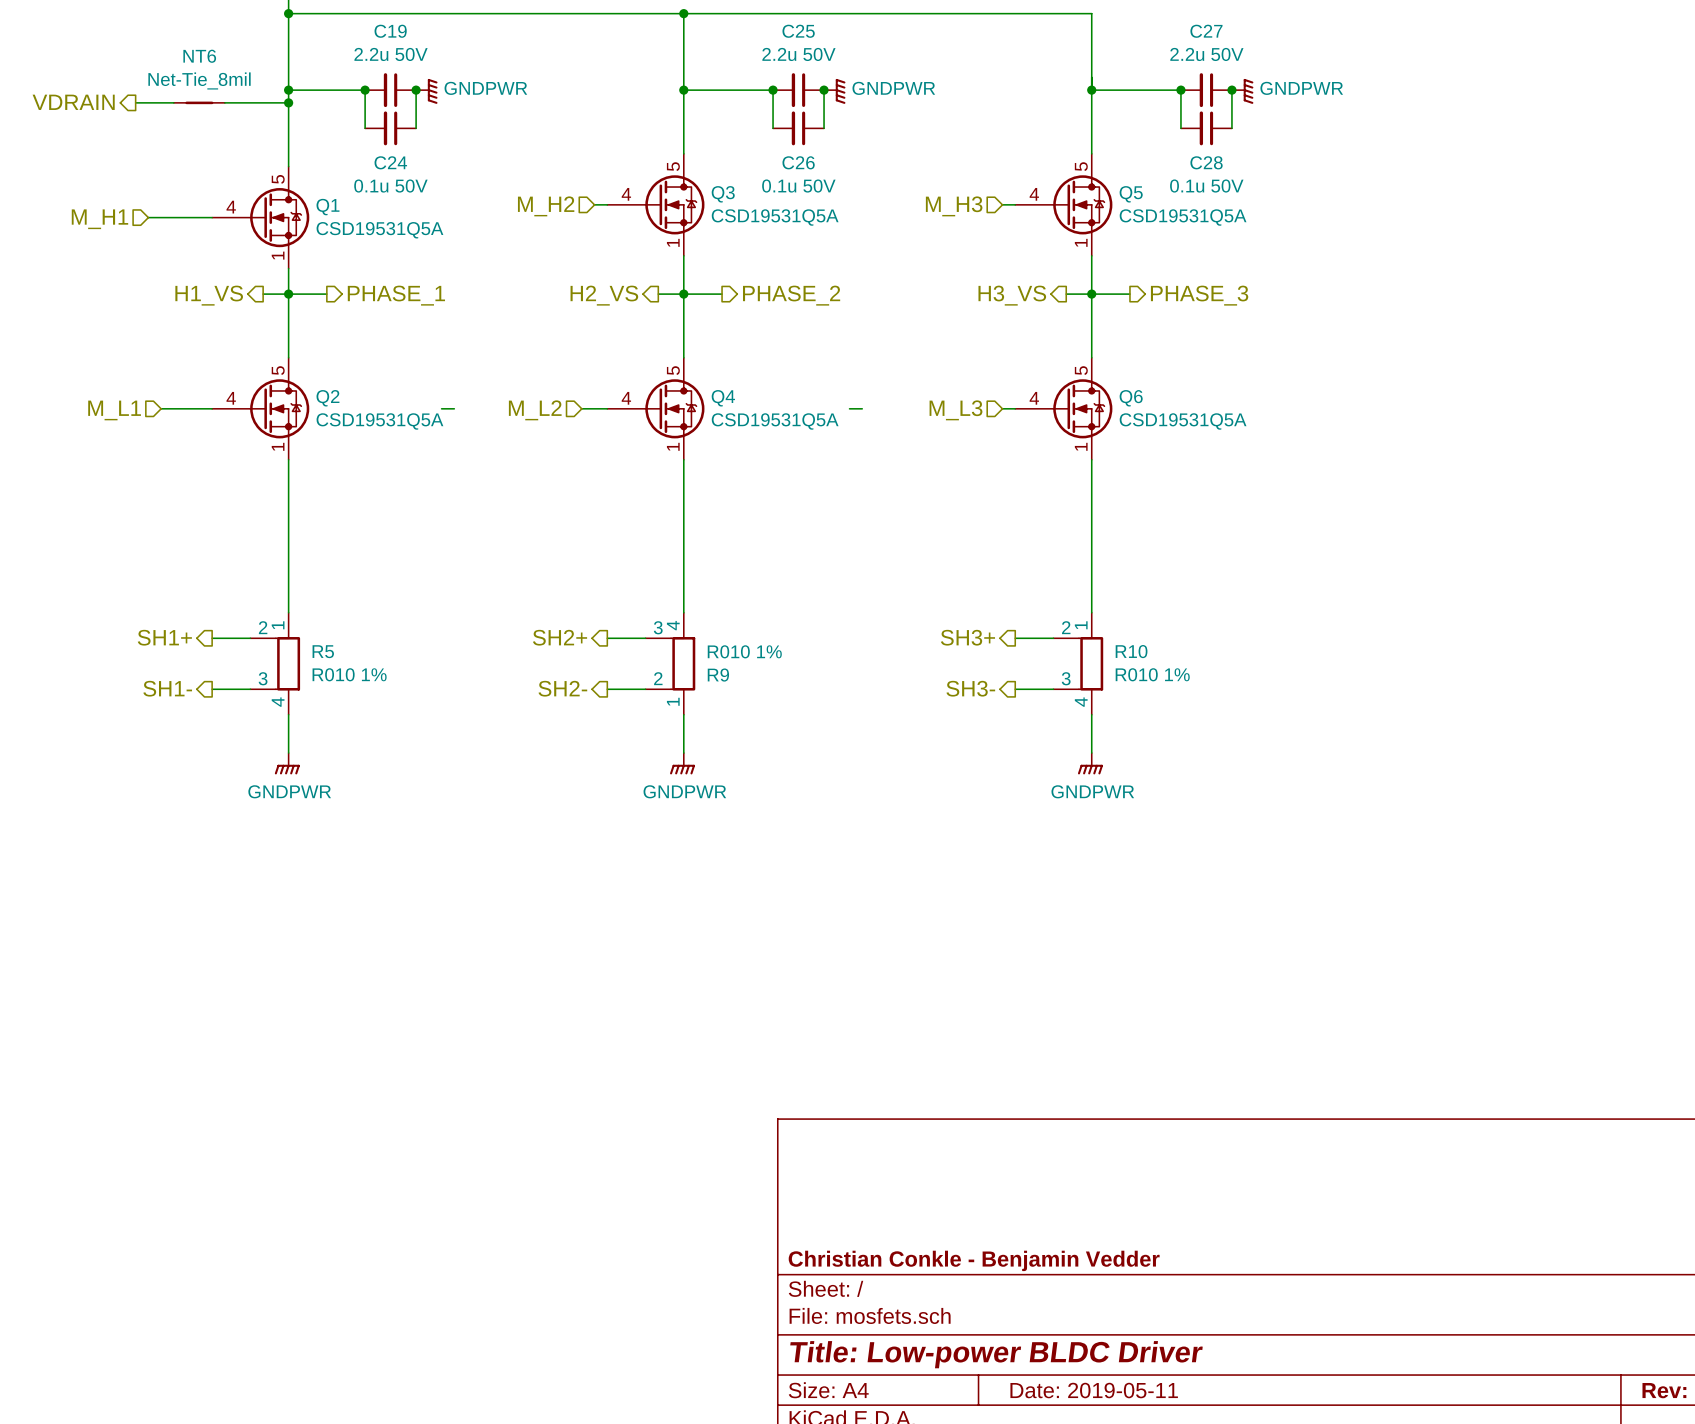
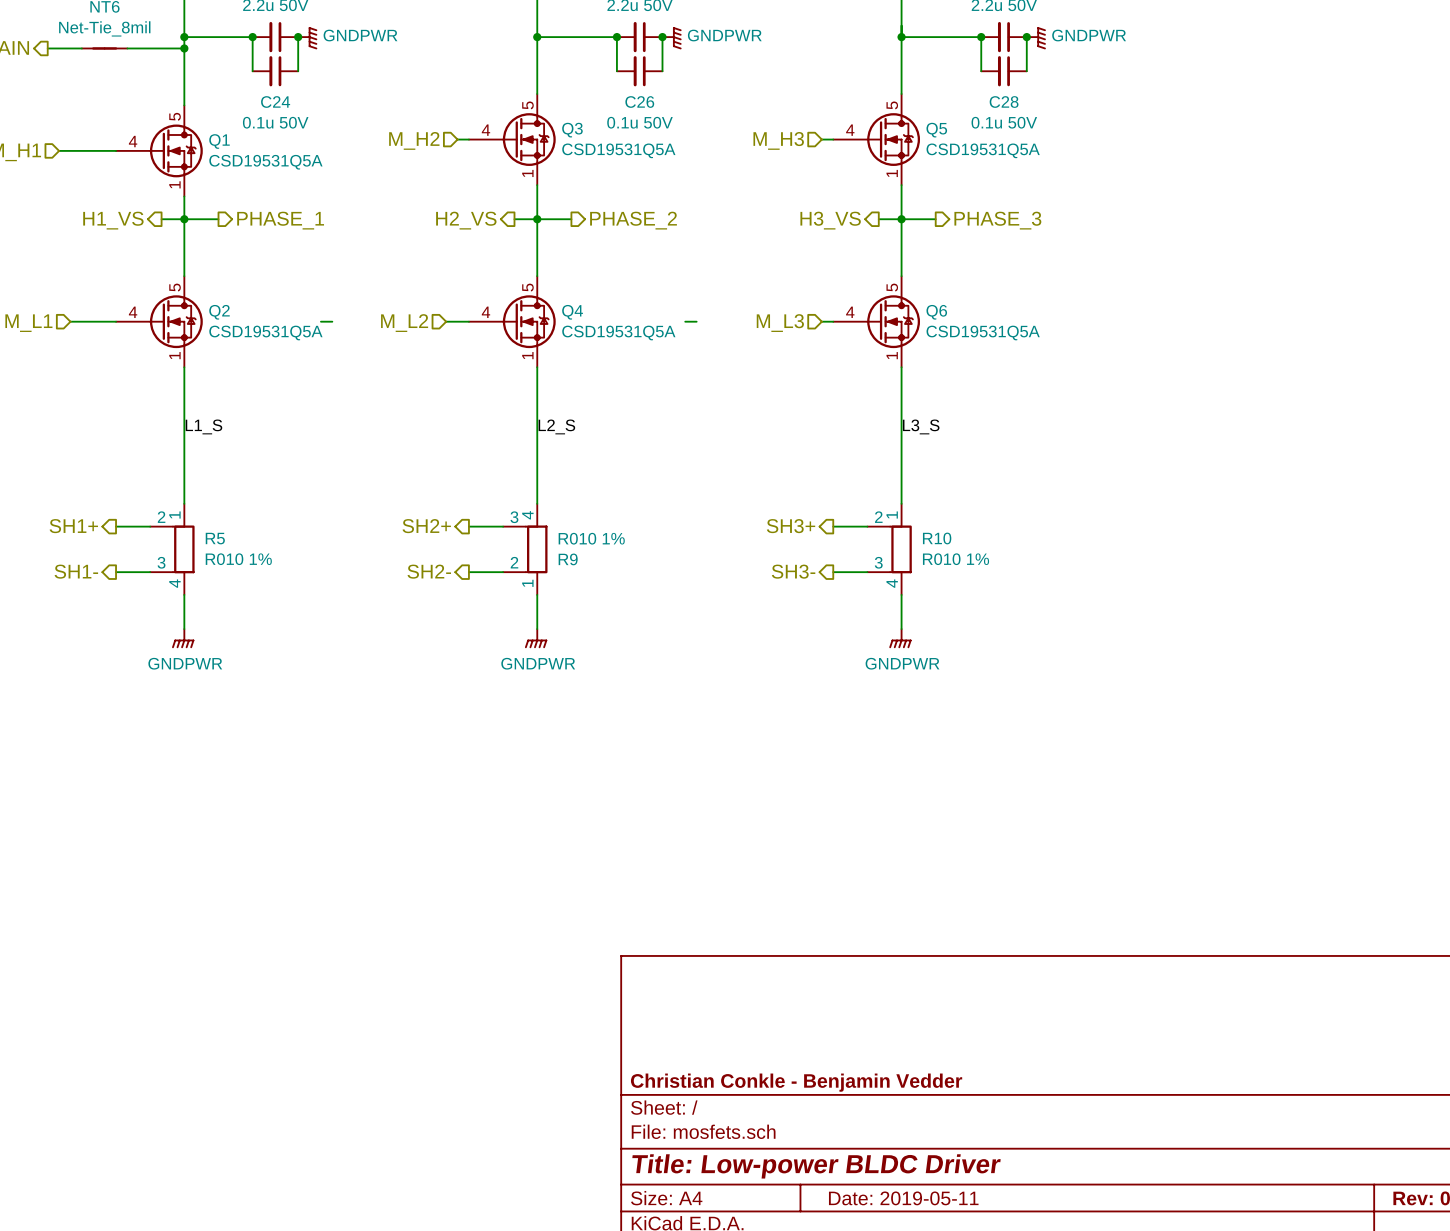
label: none -> L1_S (203, 426)
label: none -> L2_S (556, 426)
label: none -> L3_S (921, 426)

